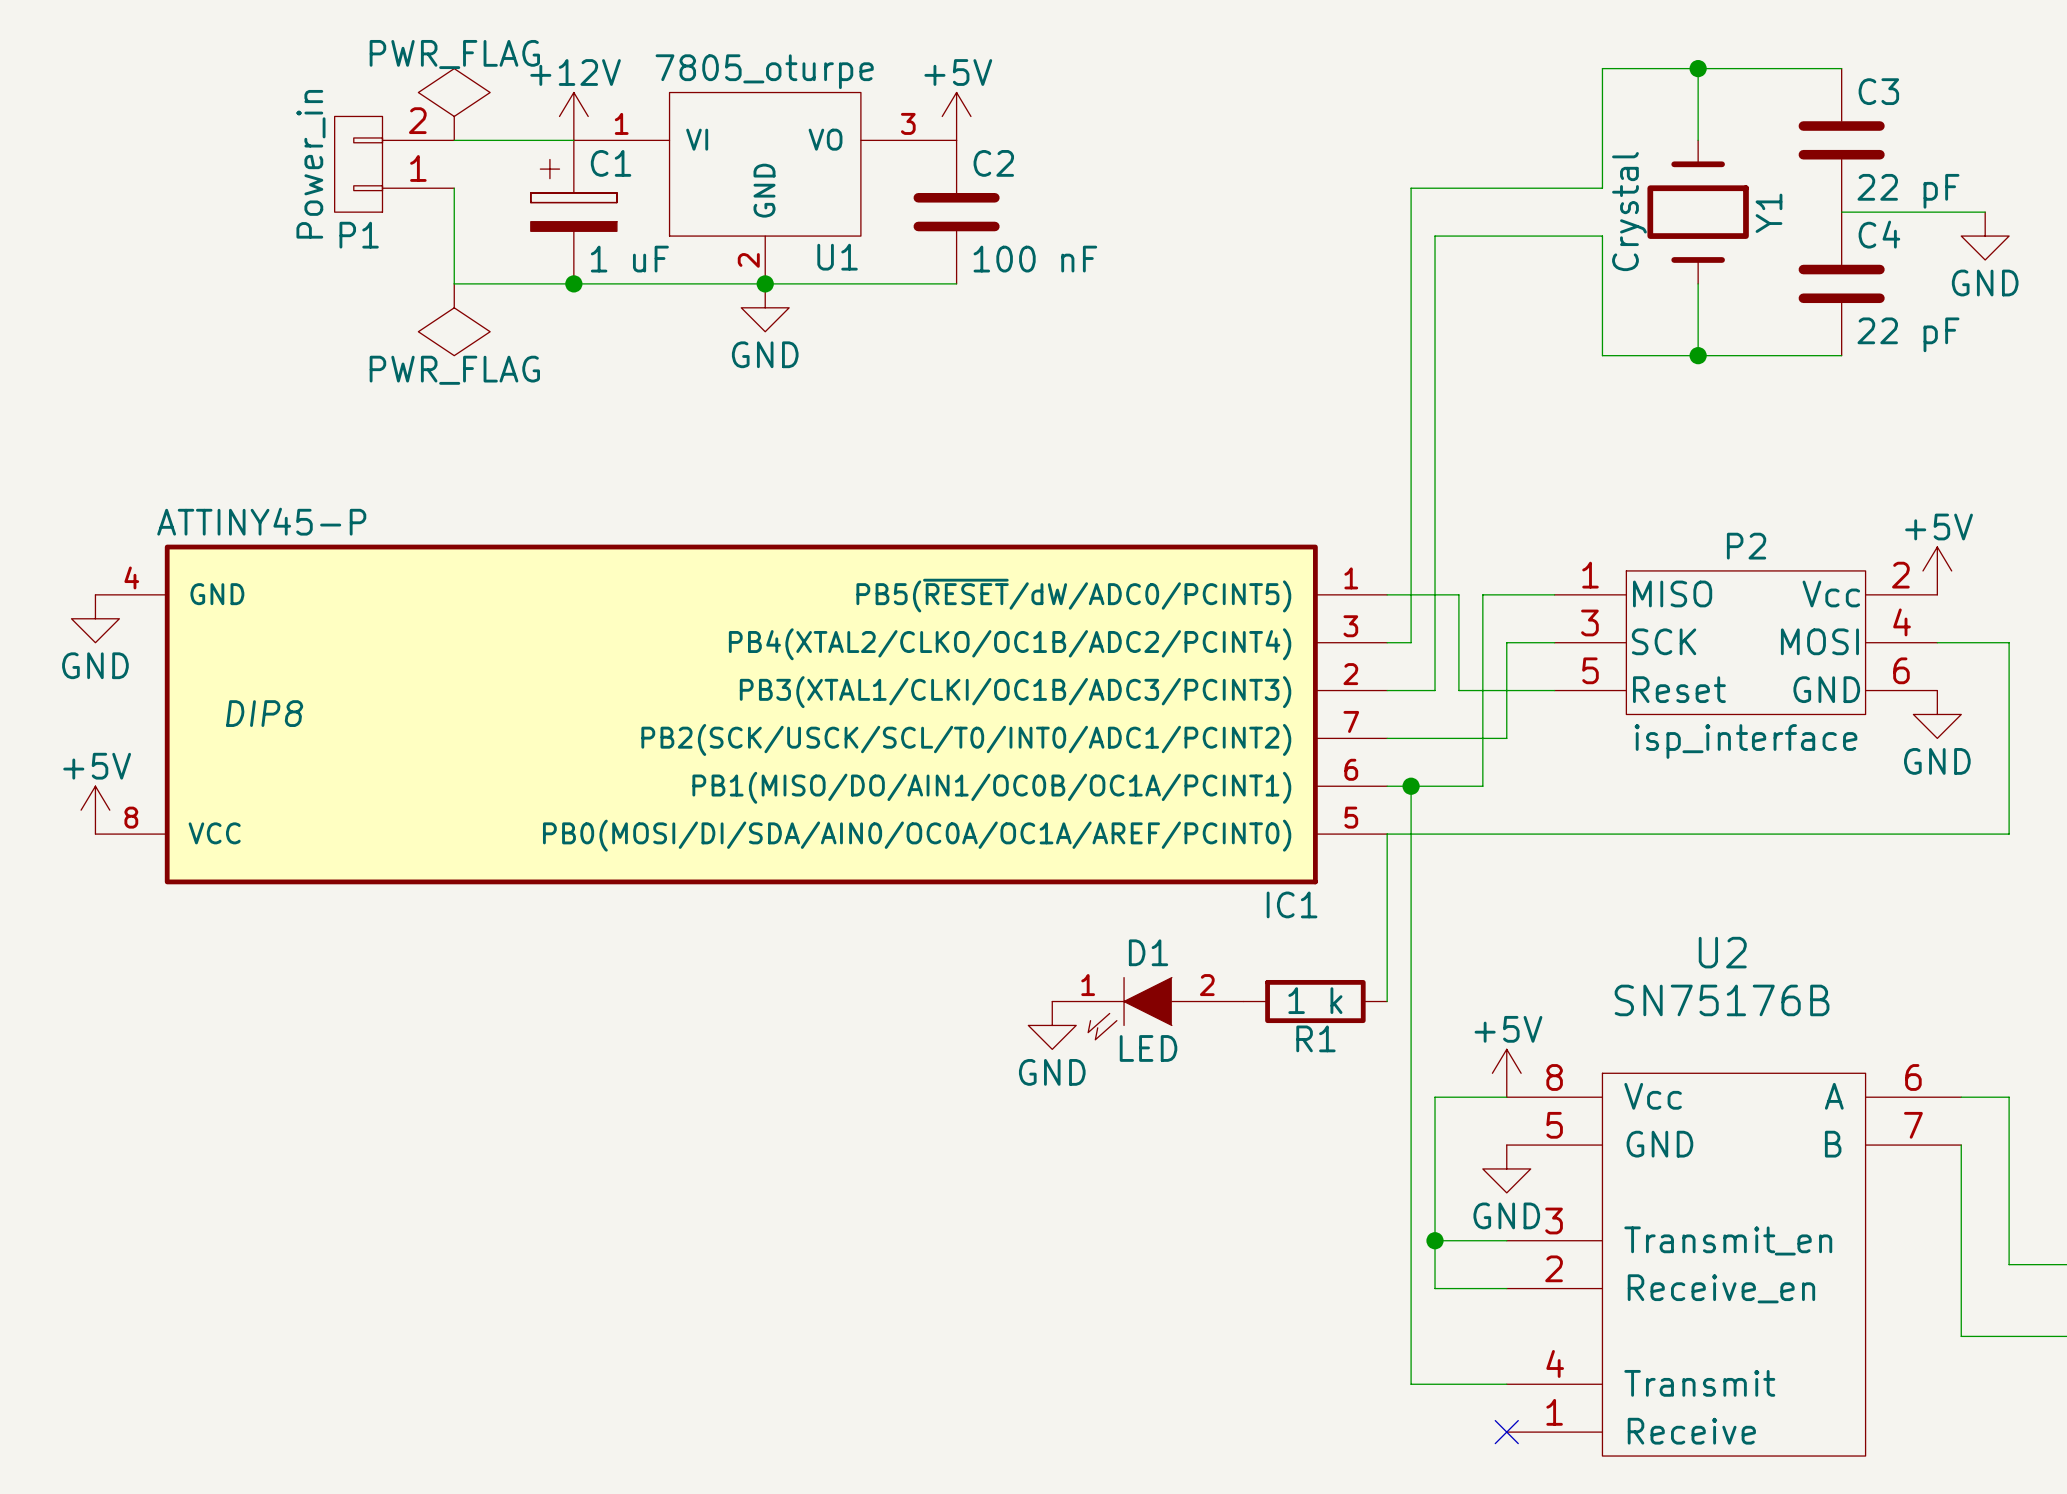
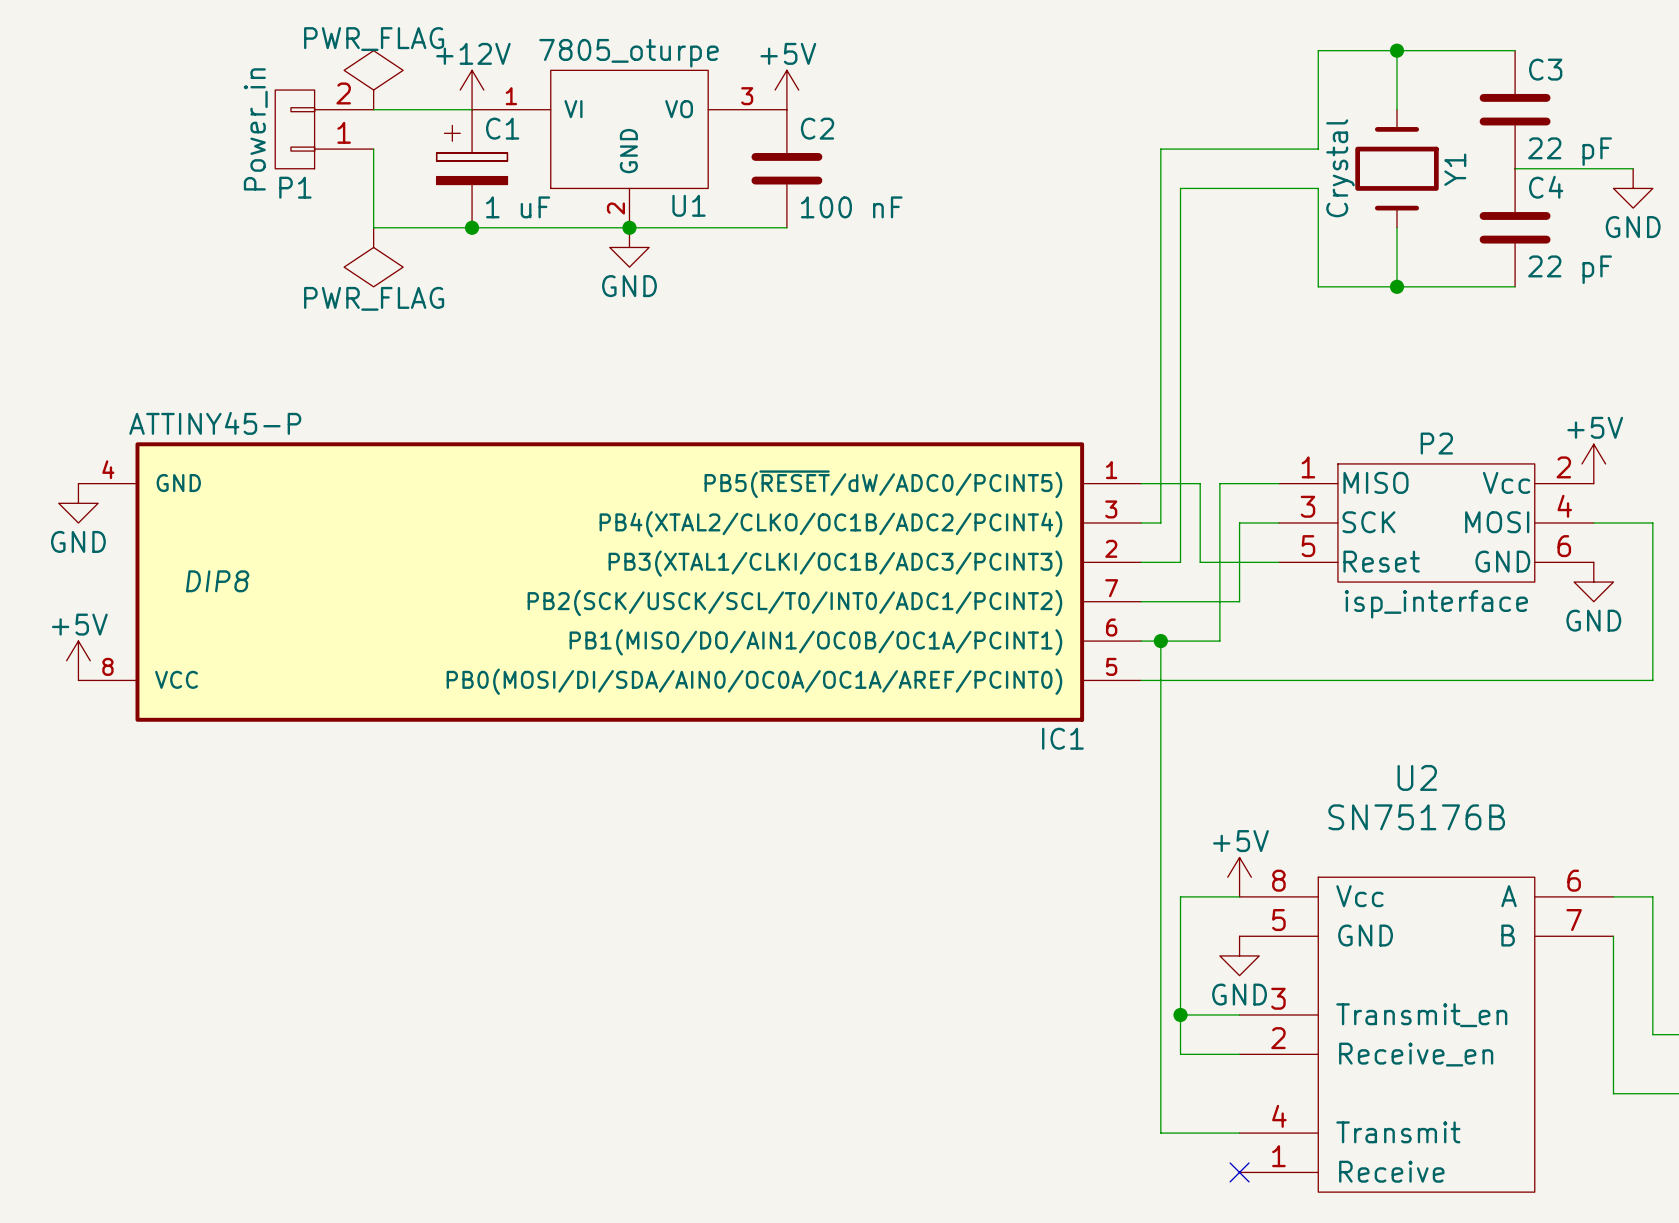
wire: (1387, 834) (1387, 1001) -> none
R1: 1 k (1315, 1001) -> none
D1: LED (1147, 1008) -> none
power symbol: GND (1052, 1025) -> none

